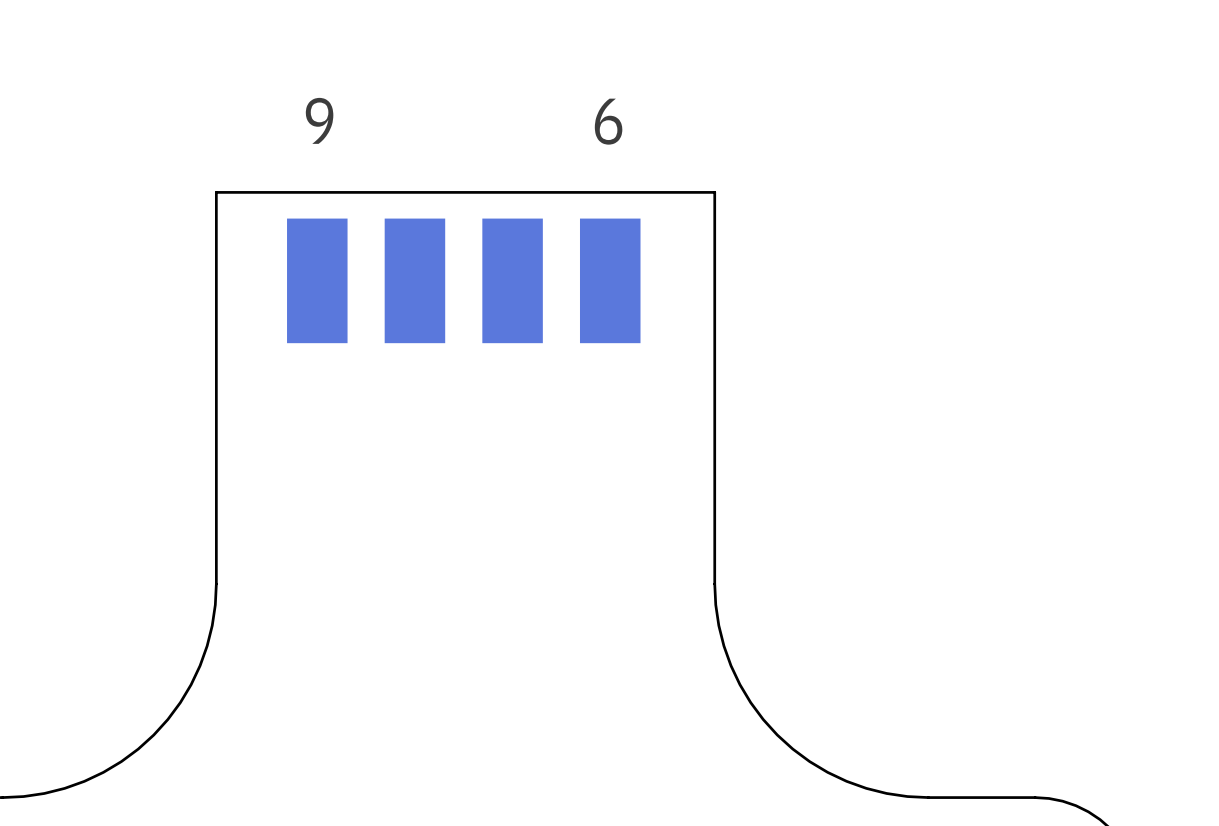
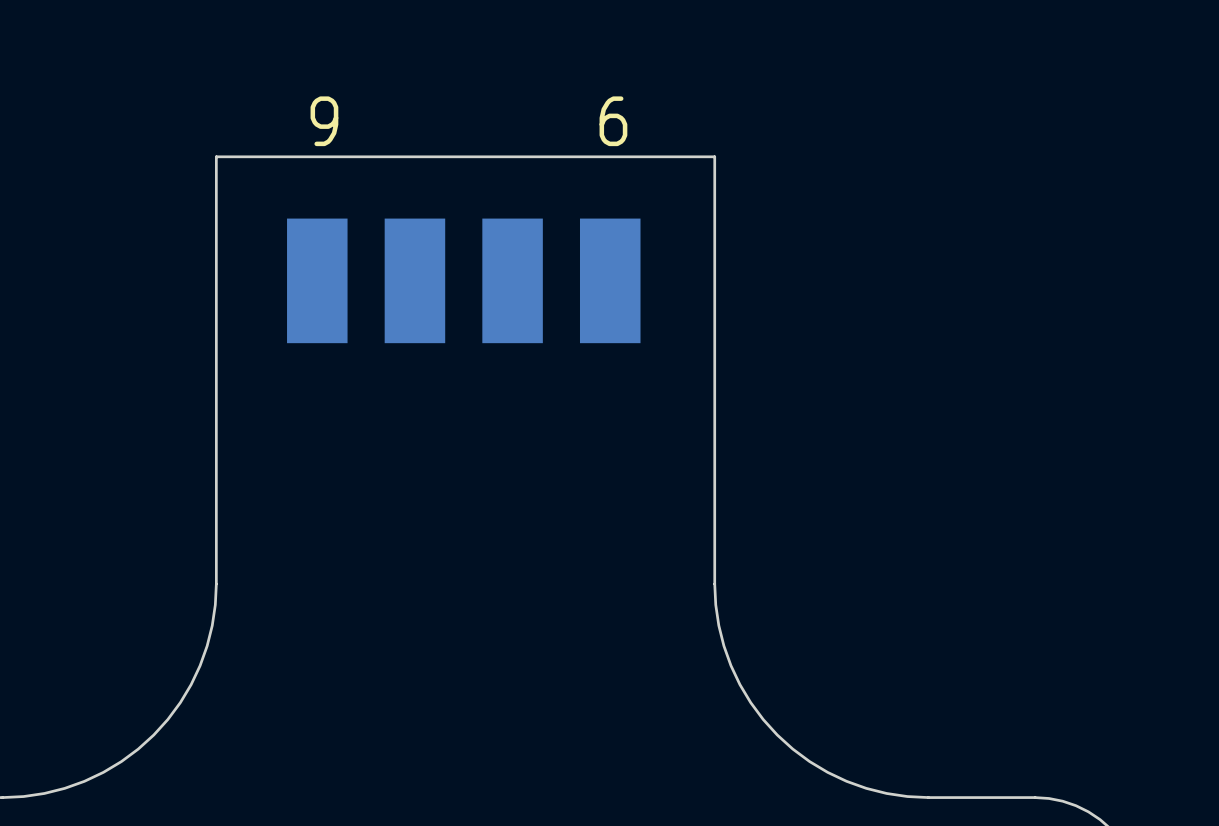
board edge: (714, 192) (216, 192) -> (714, 192) (714, 156) (216, 156) (216, 192)

